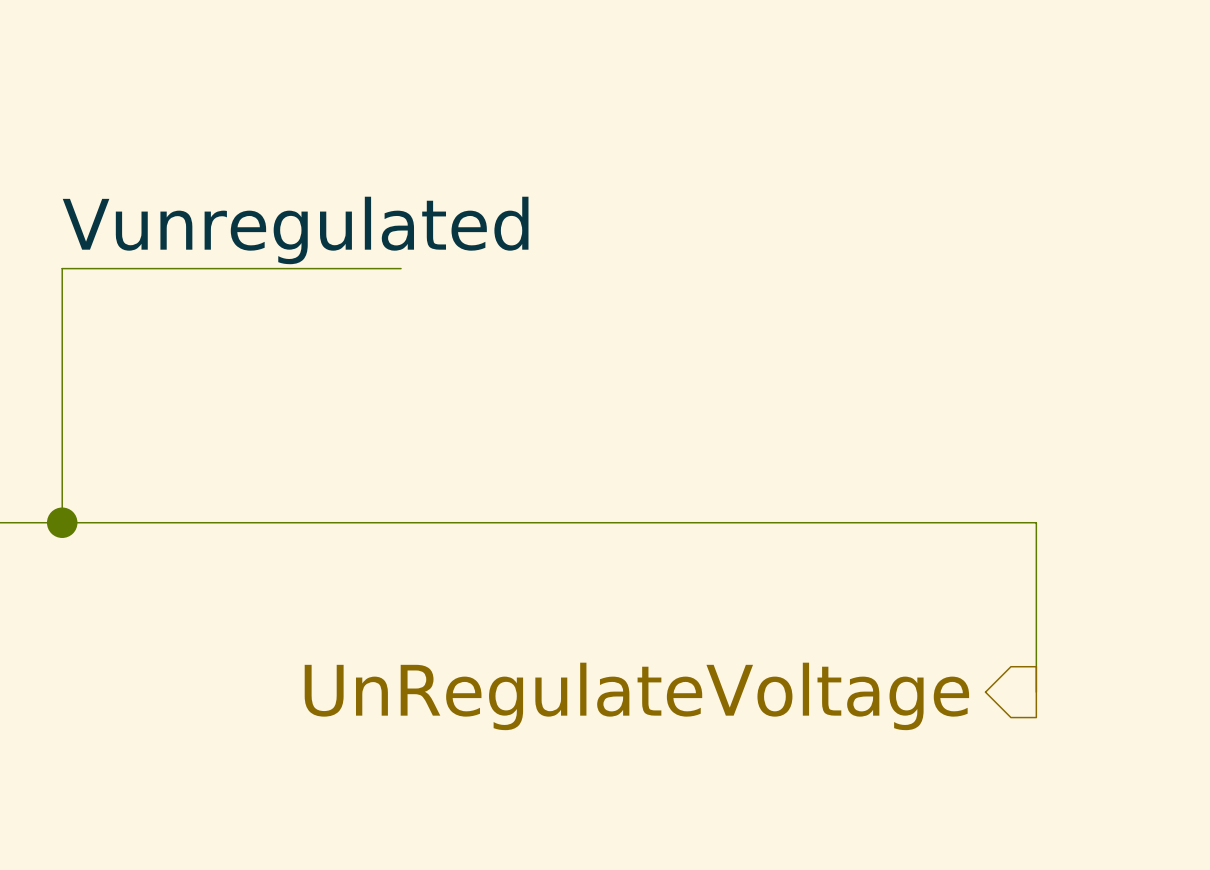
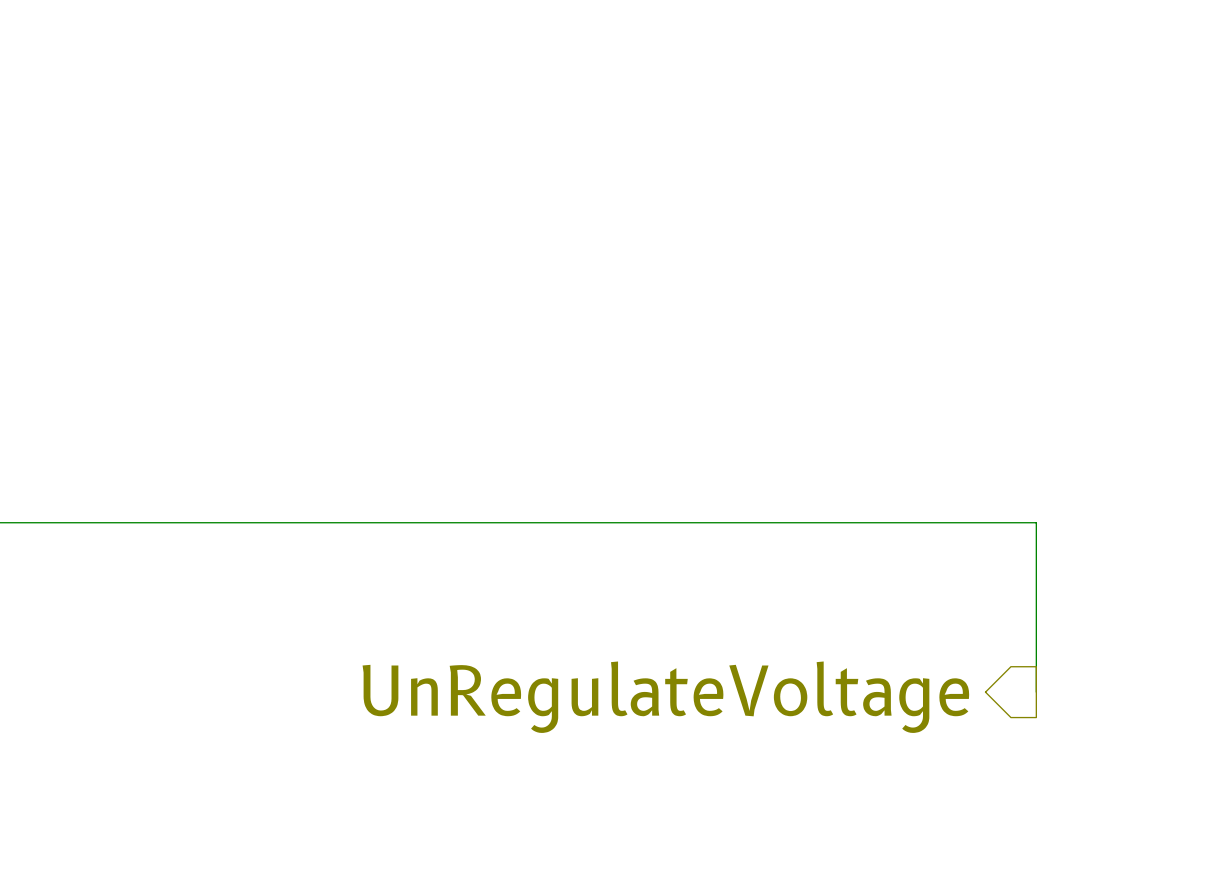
label: Vunregulated (295, 230) -> none
wire: (401, 268) (62, 268) (62, 522) -> none
junction: (62, 522) -> none

